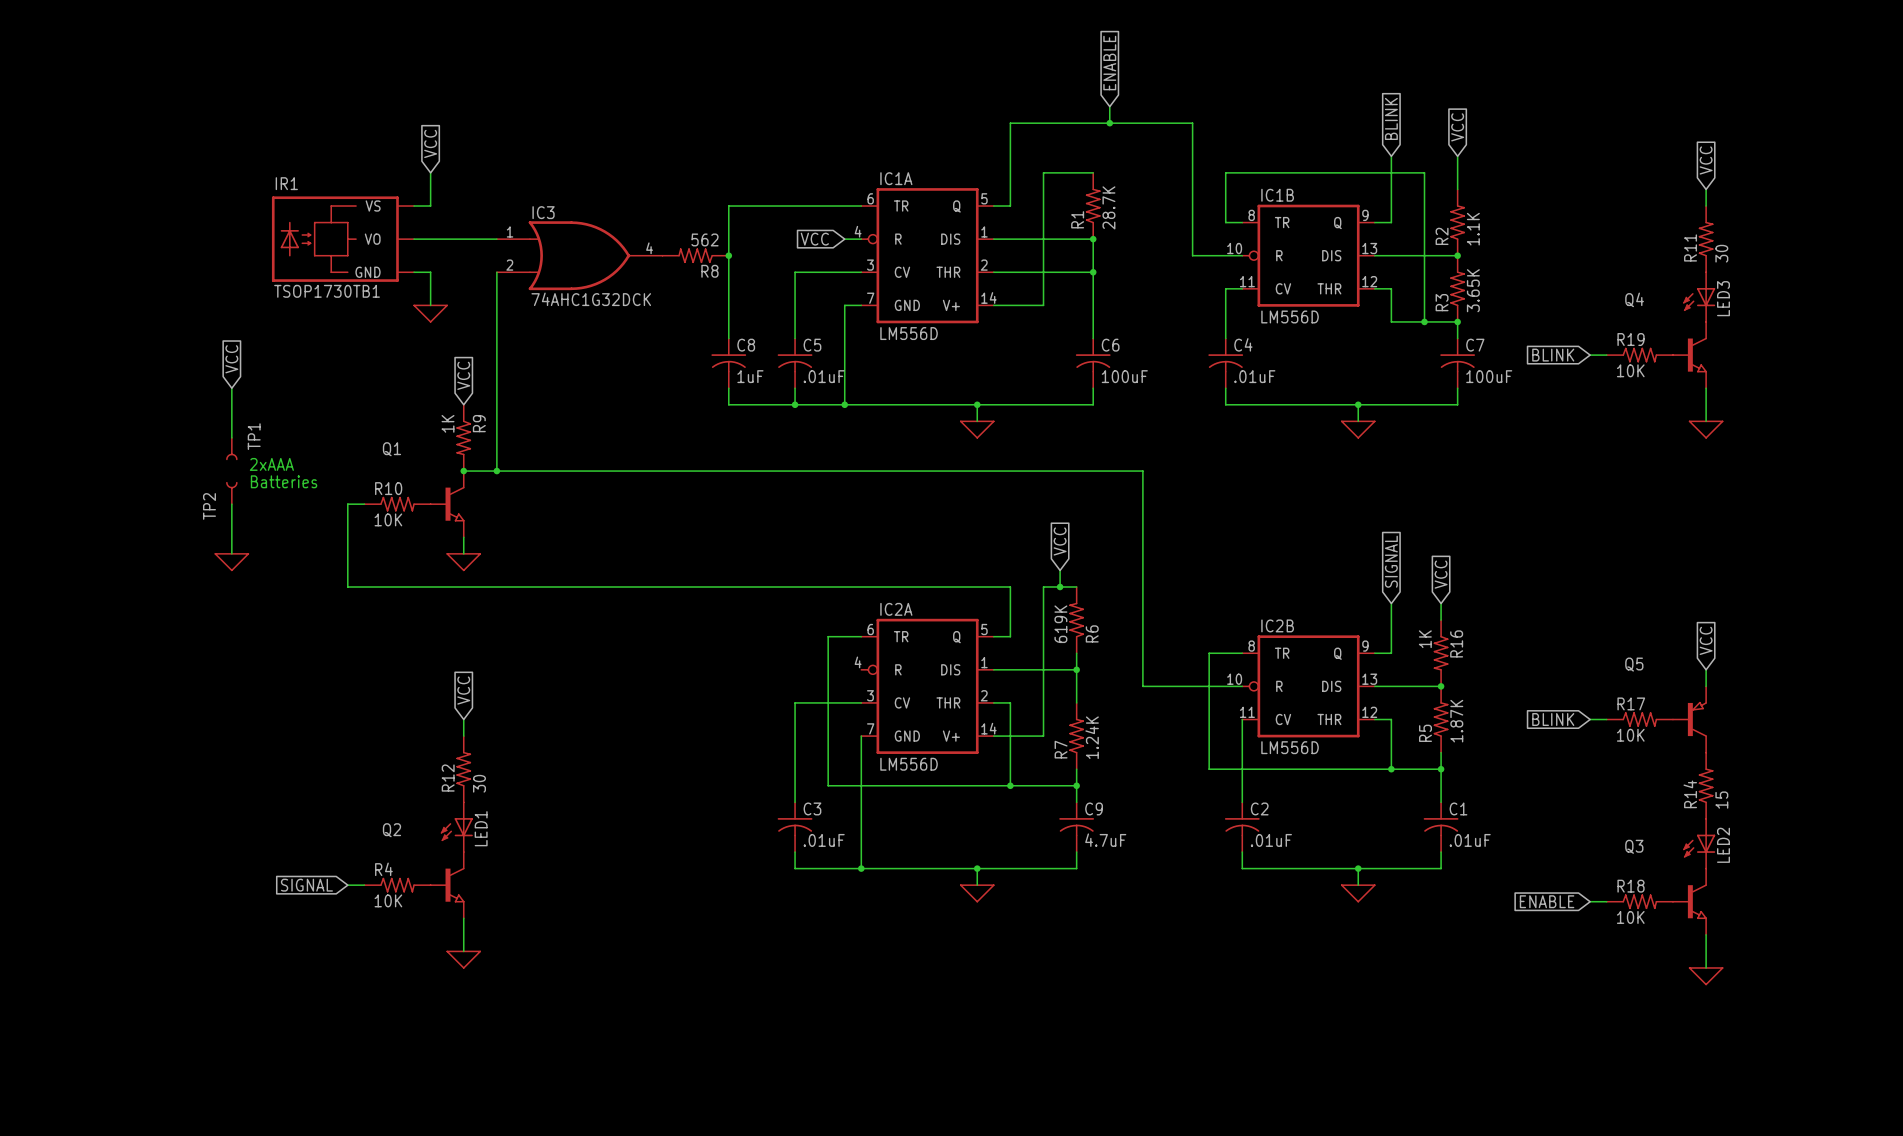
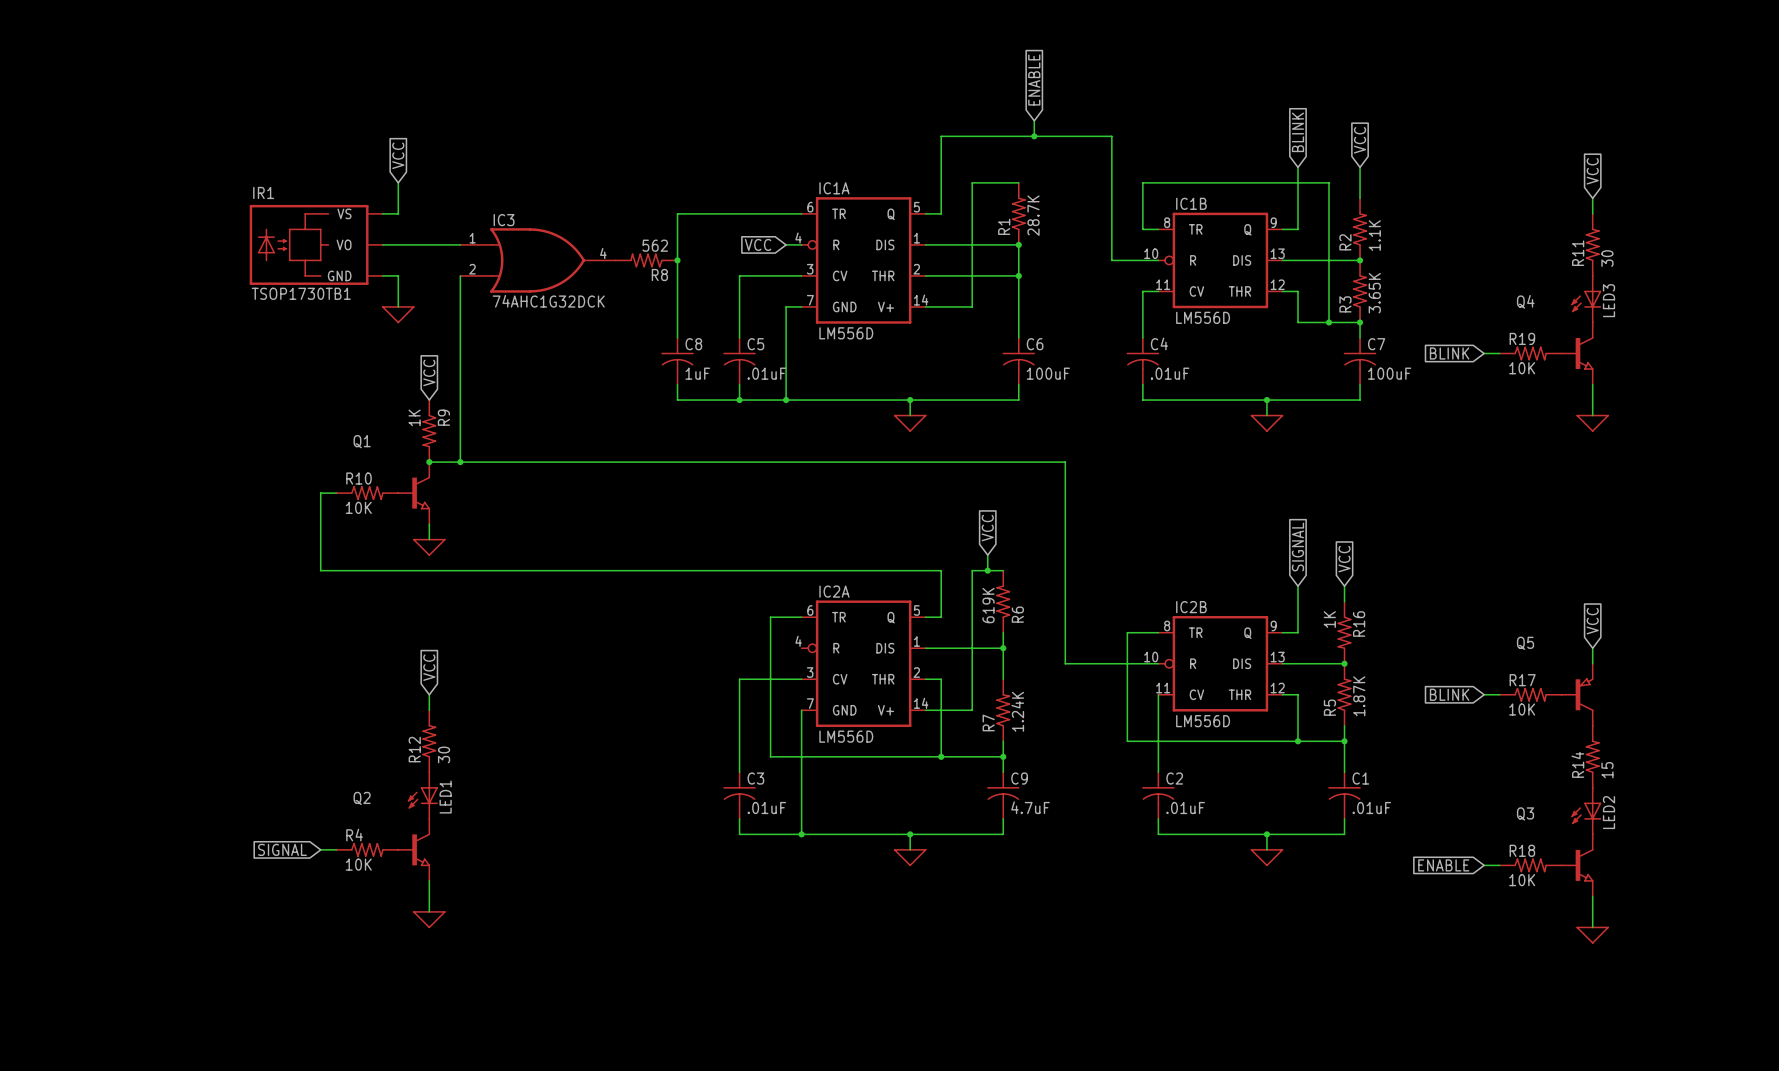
global label: VCC (231, 359) -> none
wire: (231, 388) (231, 437) -> none
TP1: (231, 448) -> none
text: 2xAAA (271, 464) -> none
text: Batteries (284, 481) -> none
TP2: (231, 493) -> none
wire: (231, 504) (231, 553) -> none
power symbol: (231, 562) -> none

